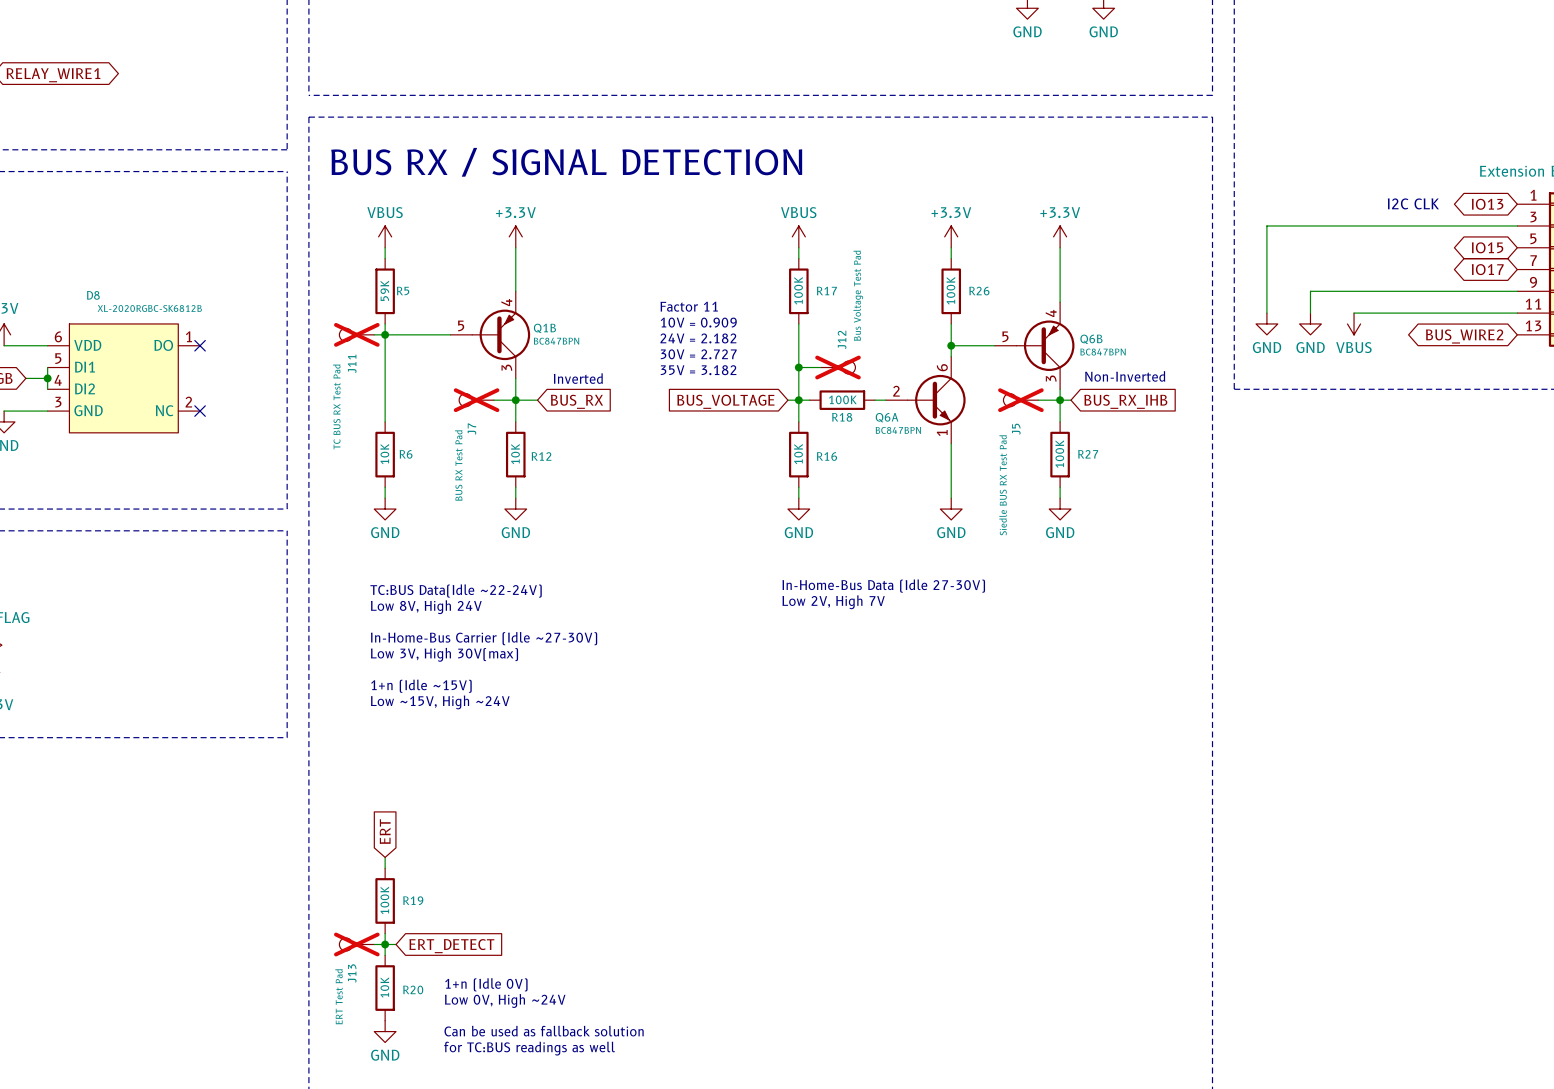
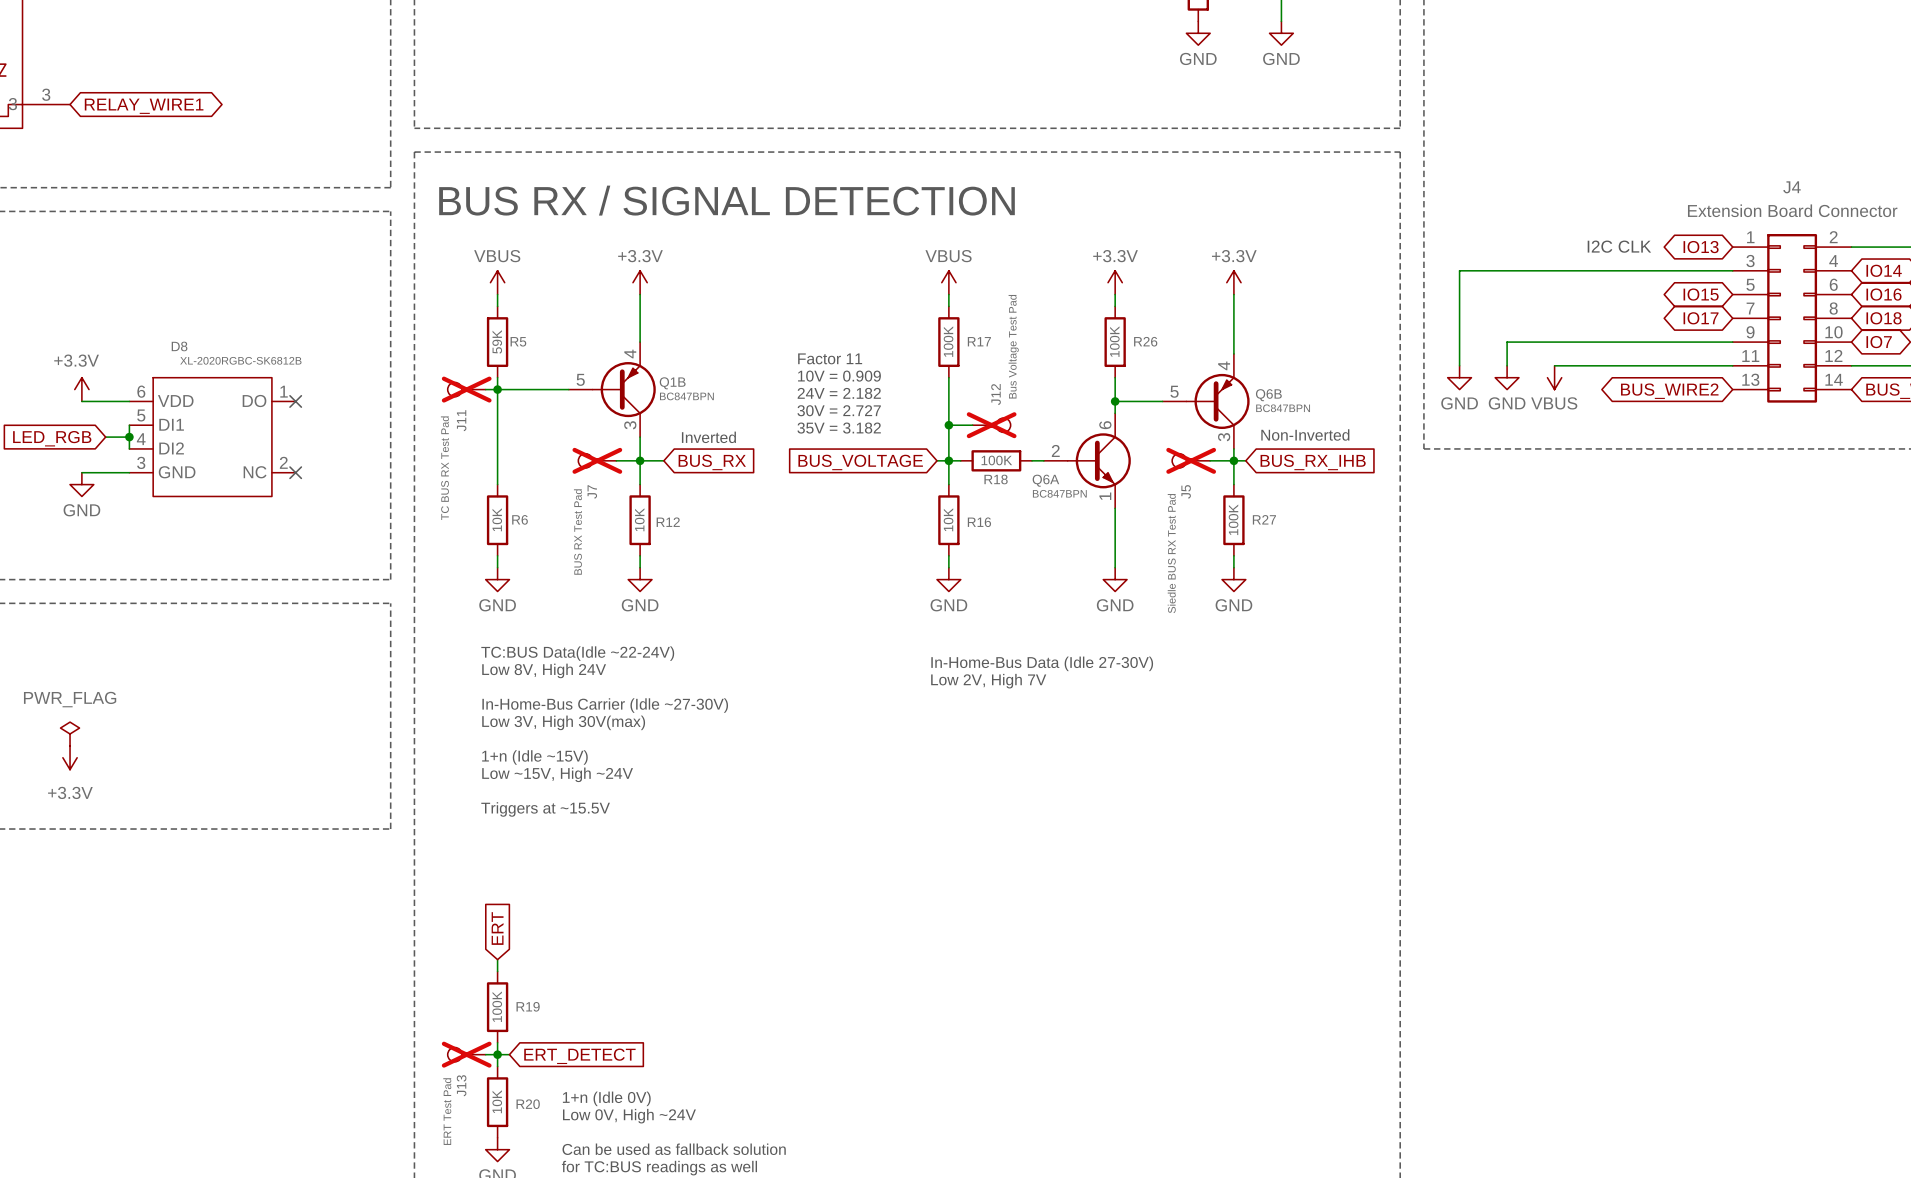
text: none -> TC:BUS Data(Idle ~22-24V) (577, 653)
text: TC:BUS Data(Idle ~22-24V) (456, 591) -> Low 8V, High 24V (544, 670)
text: Low 8V, High 24V (426, 607) -> none
text: none -> In-Home-Bus Carrier (Idle ~27-30V) (605, 705)
text: In-Home-Bus Carrier (Idle ~27-30V) (484, 638) -> Low 3V, High 30V(max) (563, 722)
text: Low 3V, High 30V(max) (444, 654) -> none
text: none -> 1+n (Idle ~15V) (534, 757)
text: 1+n (Idle ~15V) (421, 686) -> Low ~15V, High ~24V (557, 774)
text: Low ~15V, High ~24V (440, 702) -> none
text: none -> Triggers at ~15.5V (545, 809)

